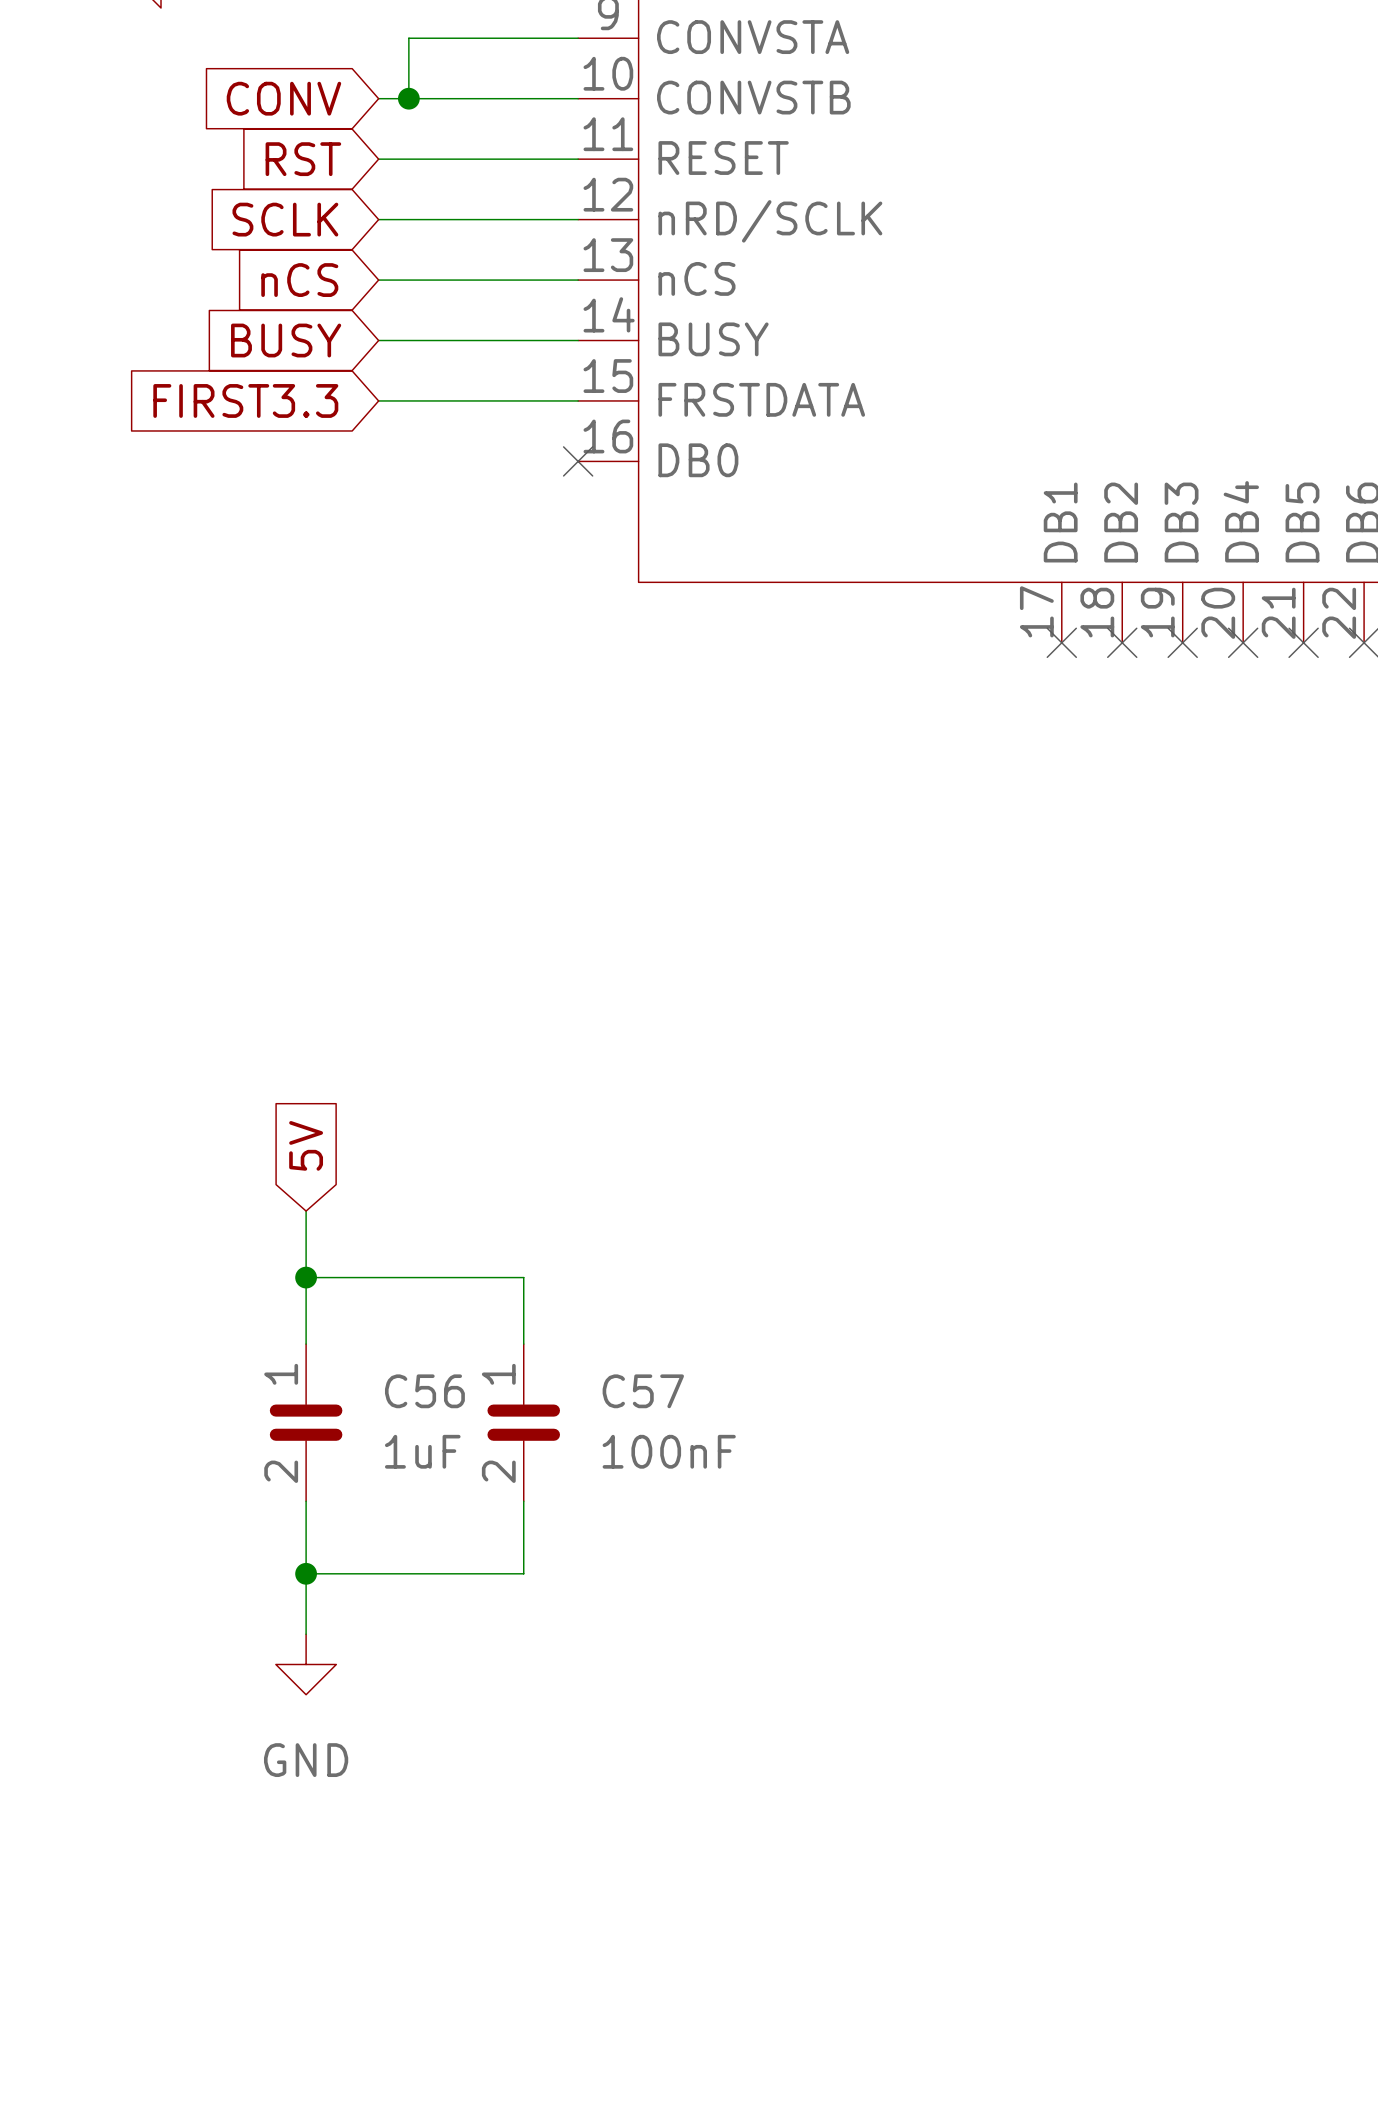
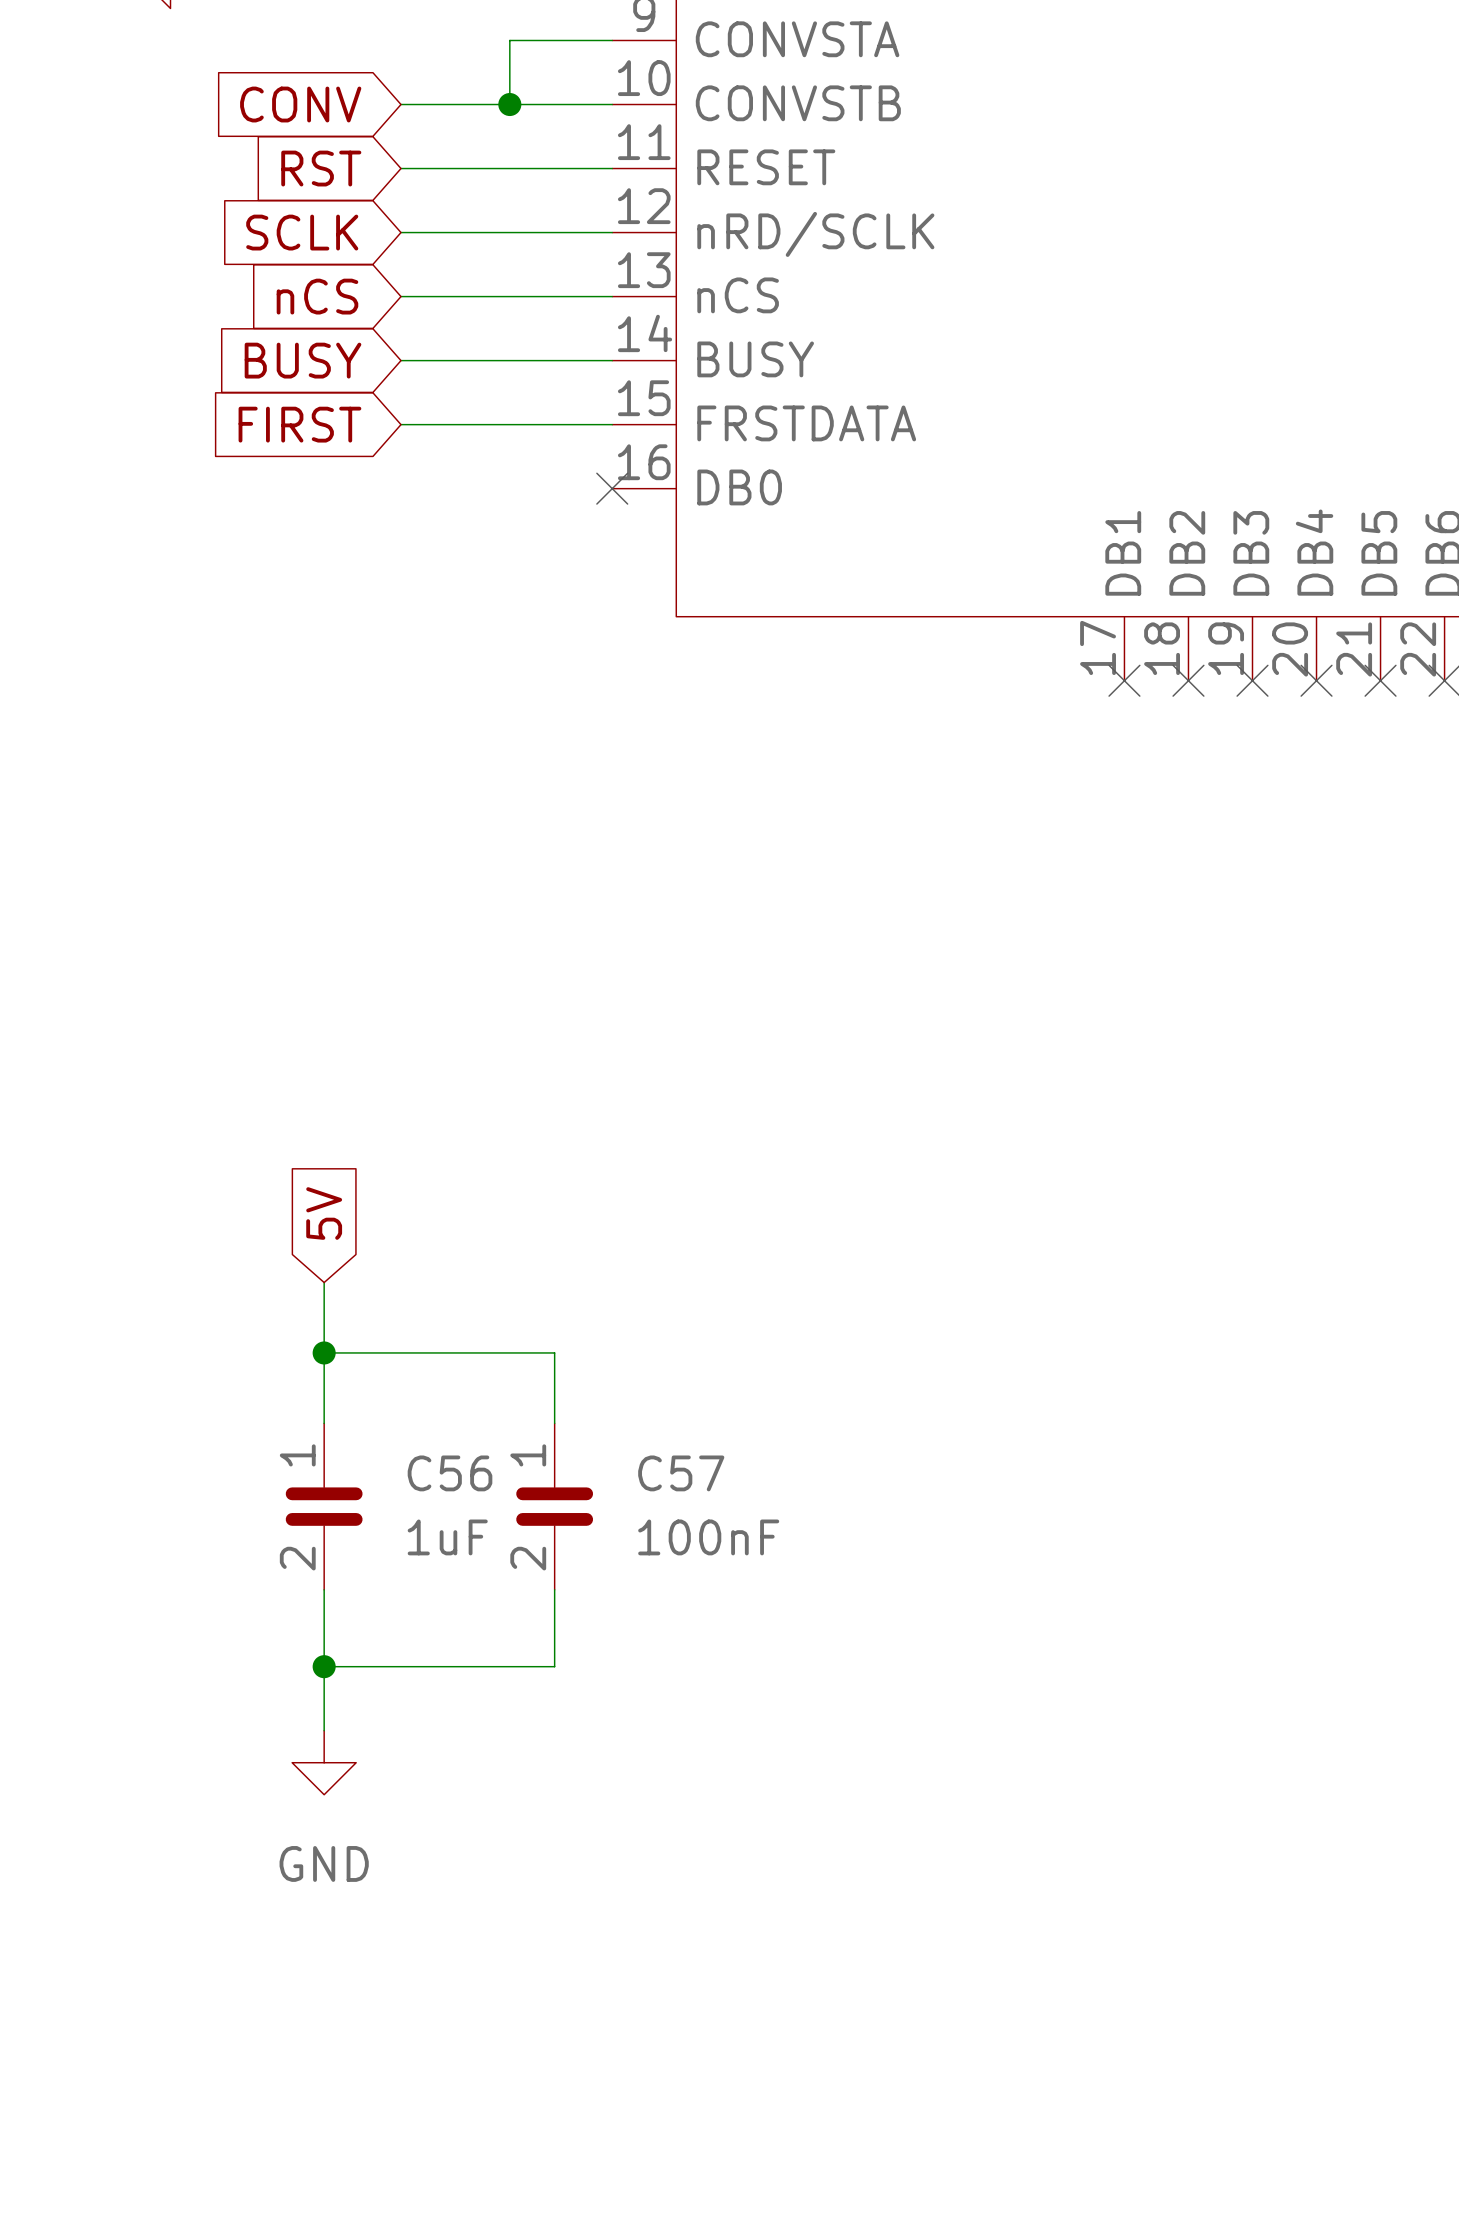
wire: (481, 38) (408, 38) (408, 98) -> (509, 40) (509, 104)
junction position: (408, 98) -> (509, 104)
global label: FIRST3.3 (245, 400) -> FIRST (299, 424)

